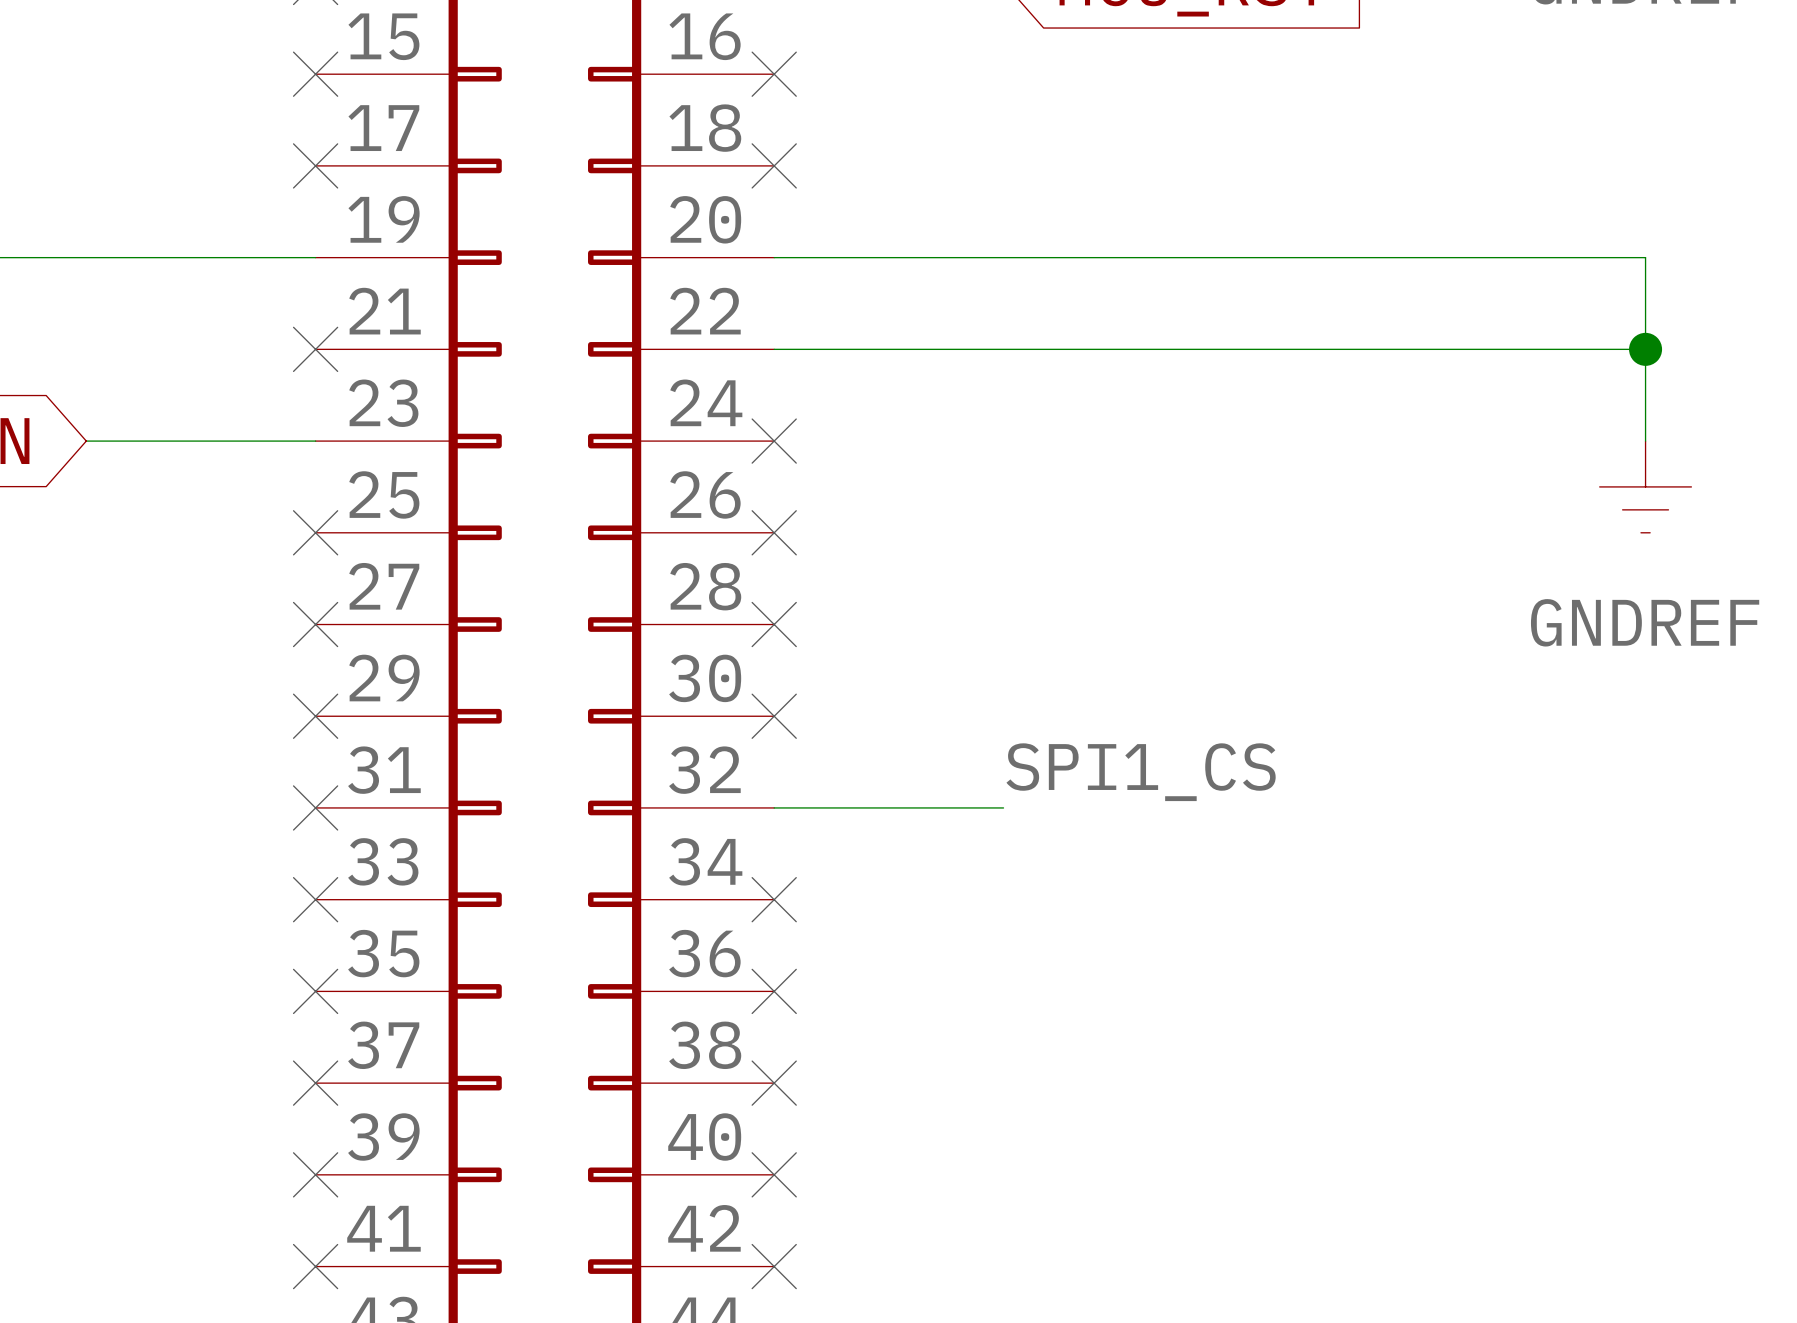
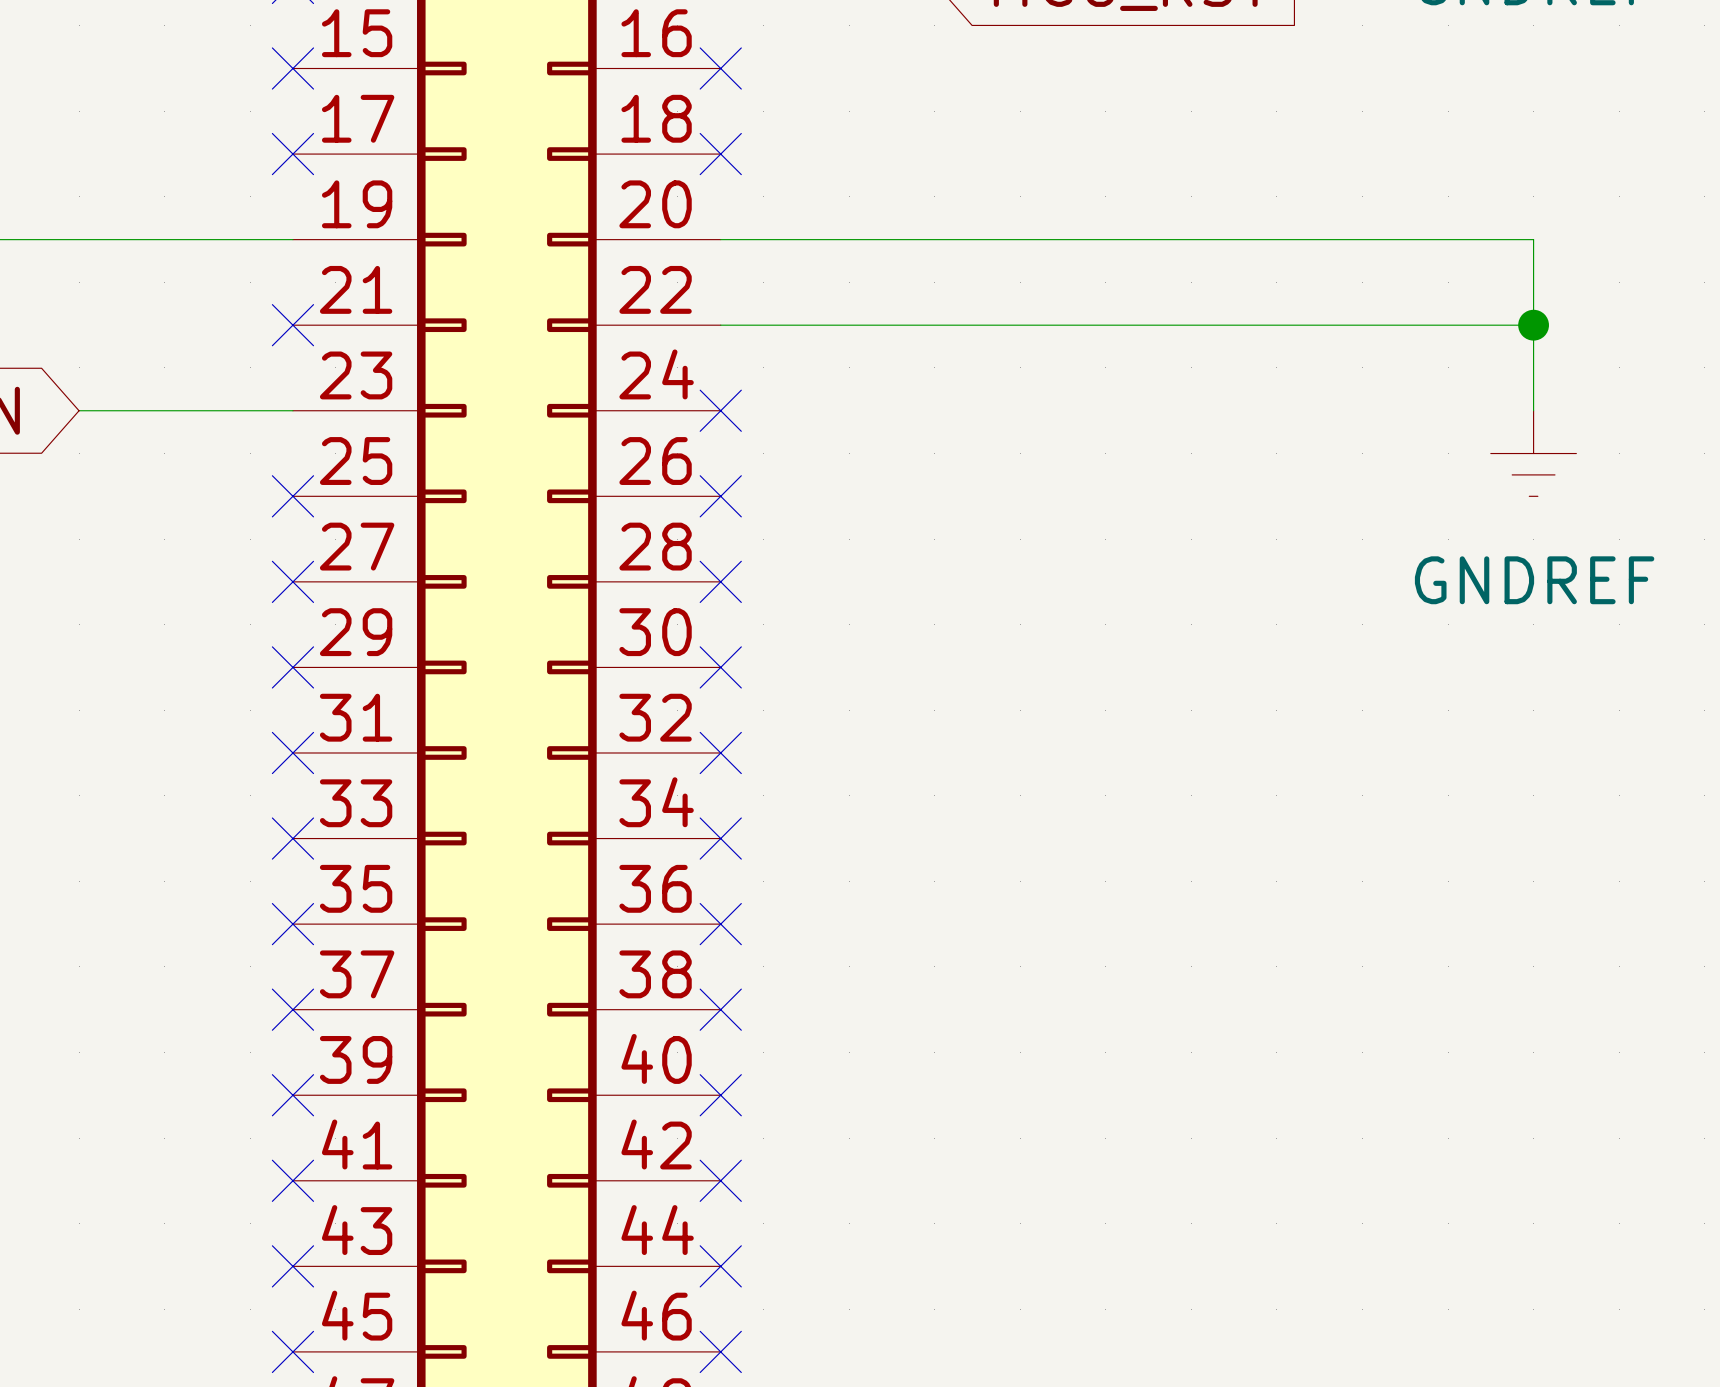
label: SPI1_CS (1141, 772) -> none
wire: (774, 807) (1003, 807) -> none
no-connect mark: none -> (720, 752)

